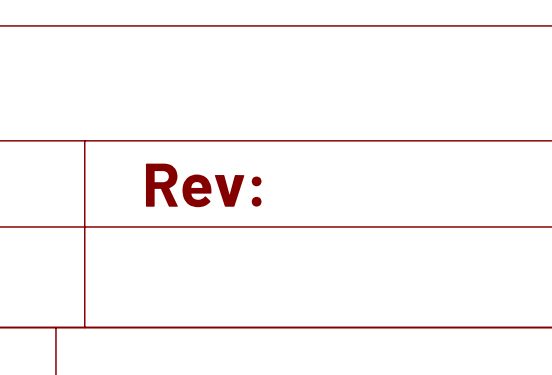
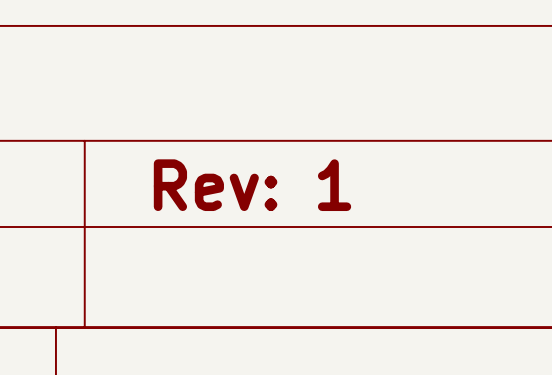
title block: Rev: (203, 185) -> Rev: 1 (252, 185)

